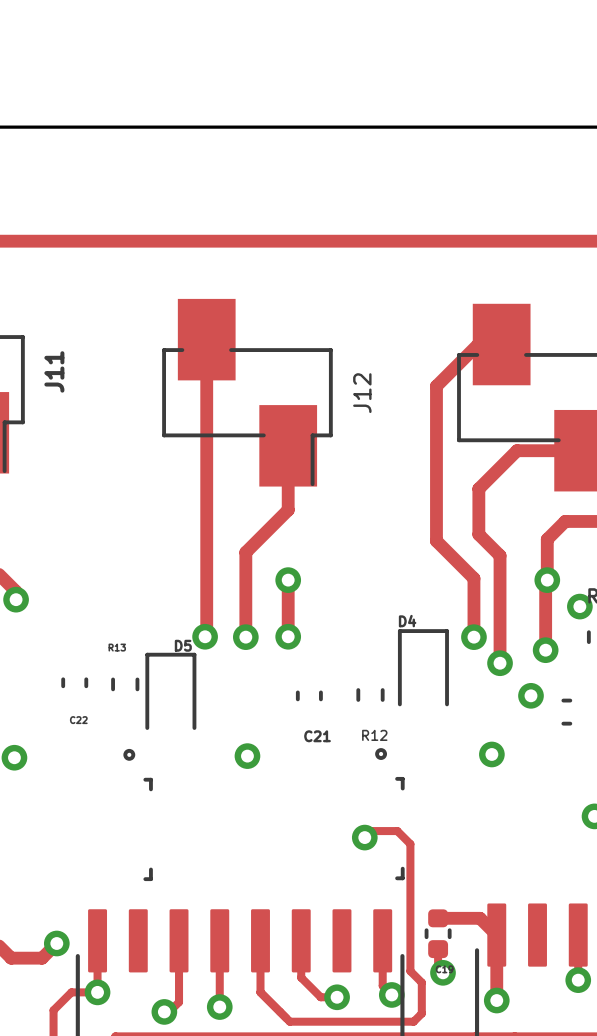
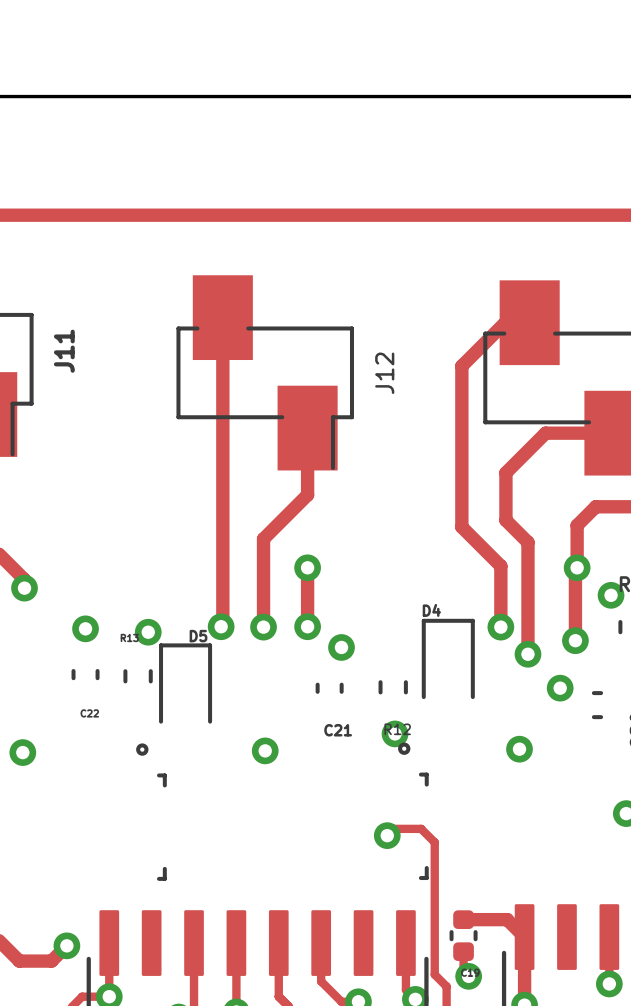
via: none -> (85, 628)
via: none -> (148, 632)
via: none -> (341, 647)
via: none -> (395, 733)

